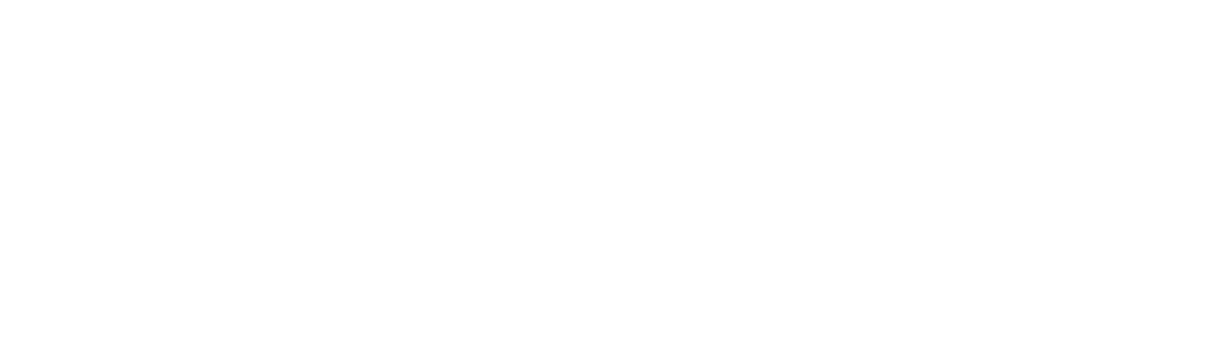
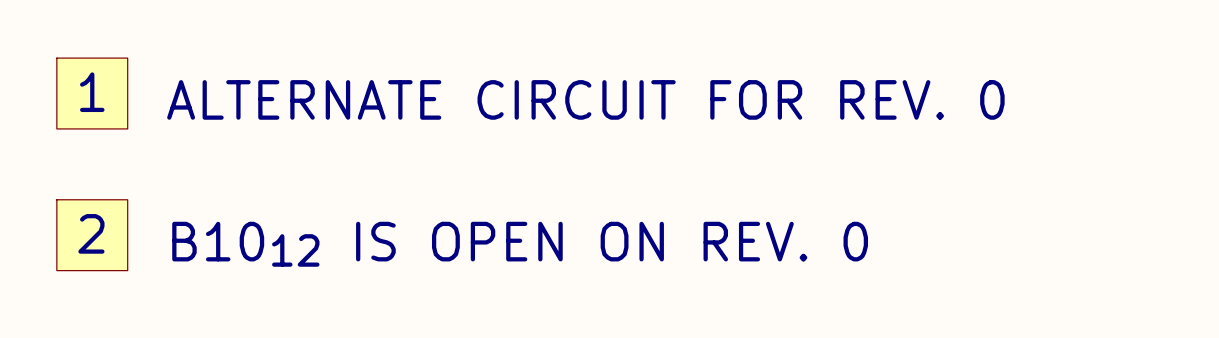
part: none -> 1 (92, 93)
text: none -> ALTERNATE CIRCUIT FOR REV. 0 (585, 99)
part: none -> 2 (92, 235)
text: none -> B1012 IS OPEN ON REV. 0 (520, 244)

